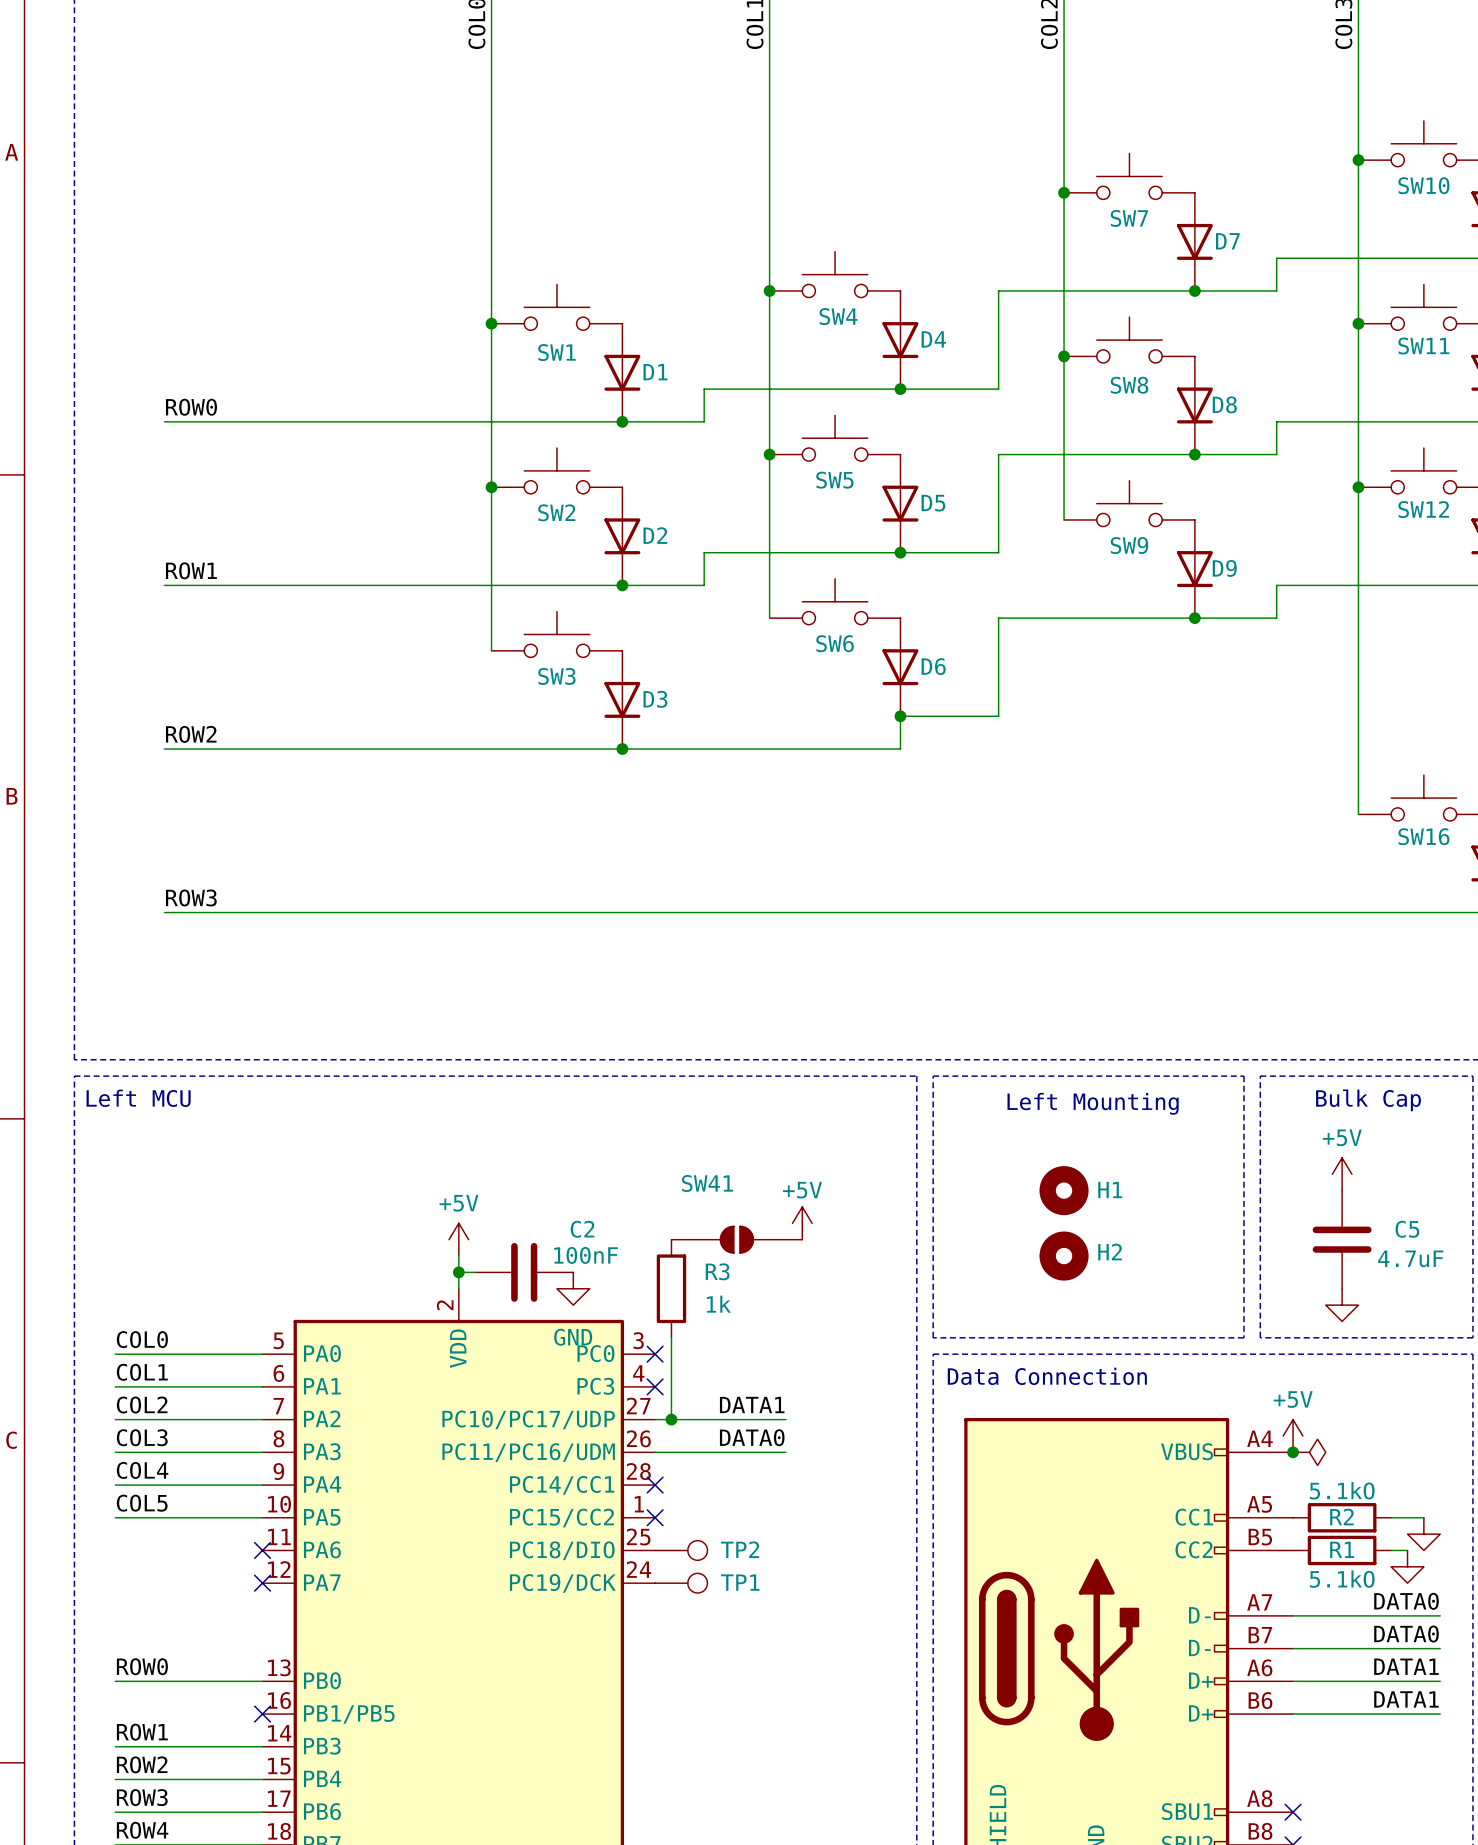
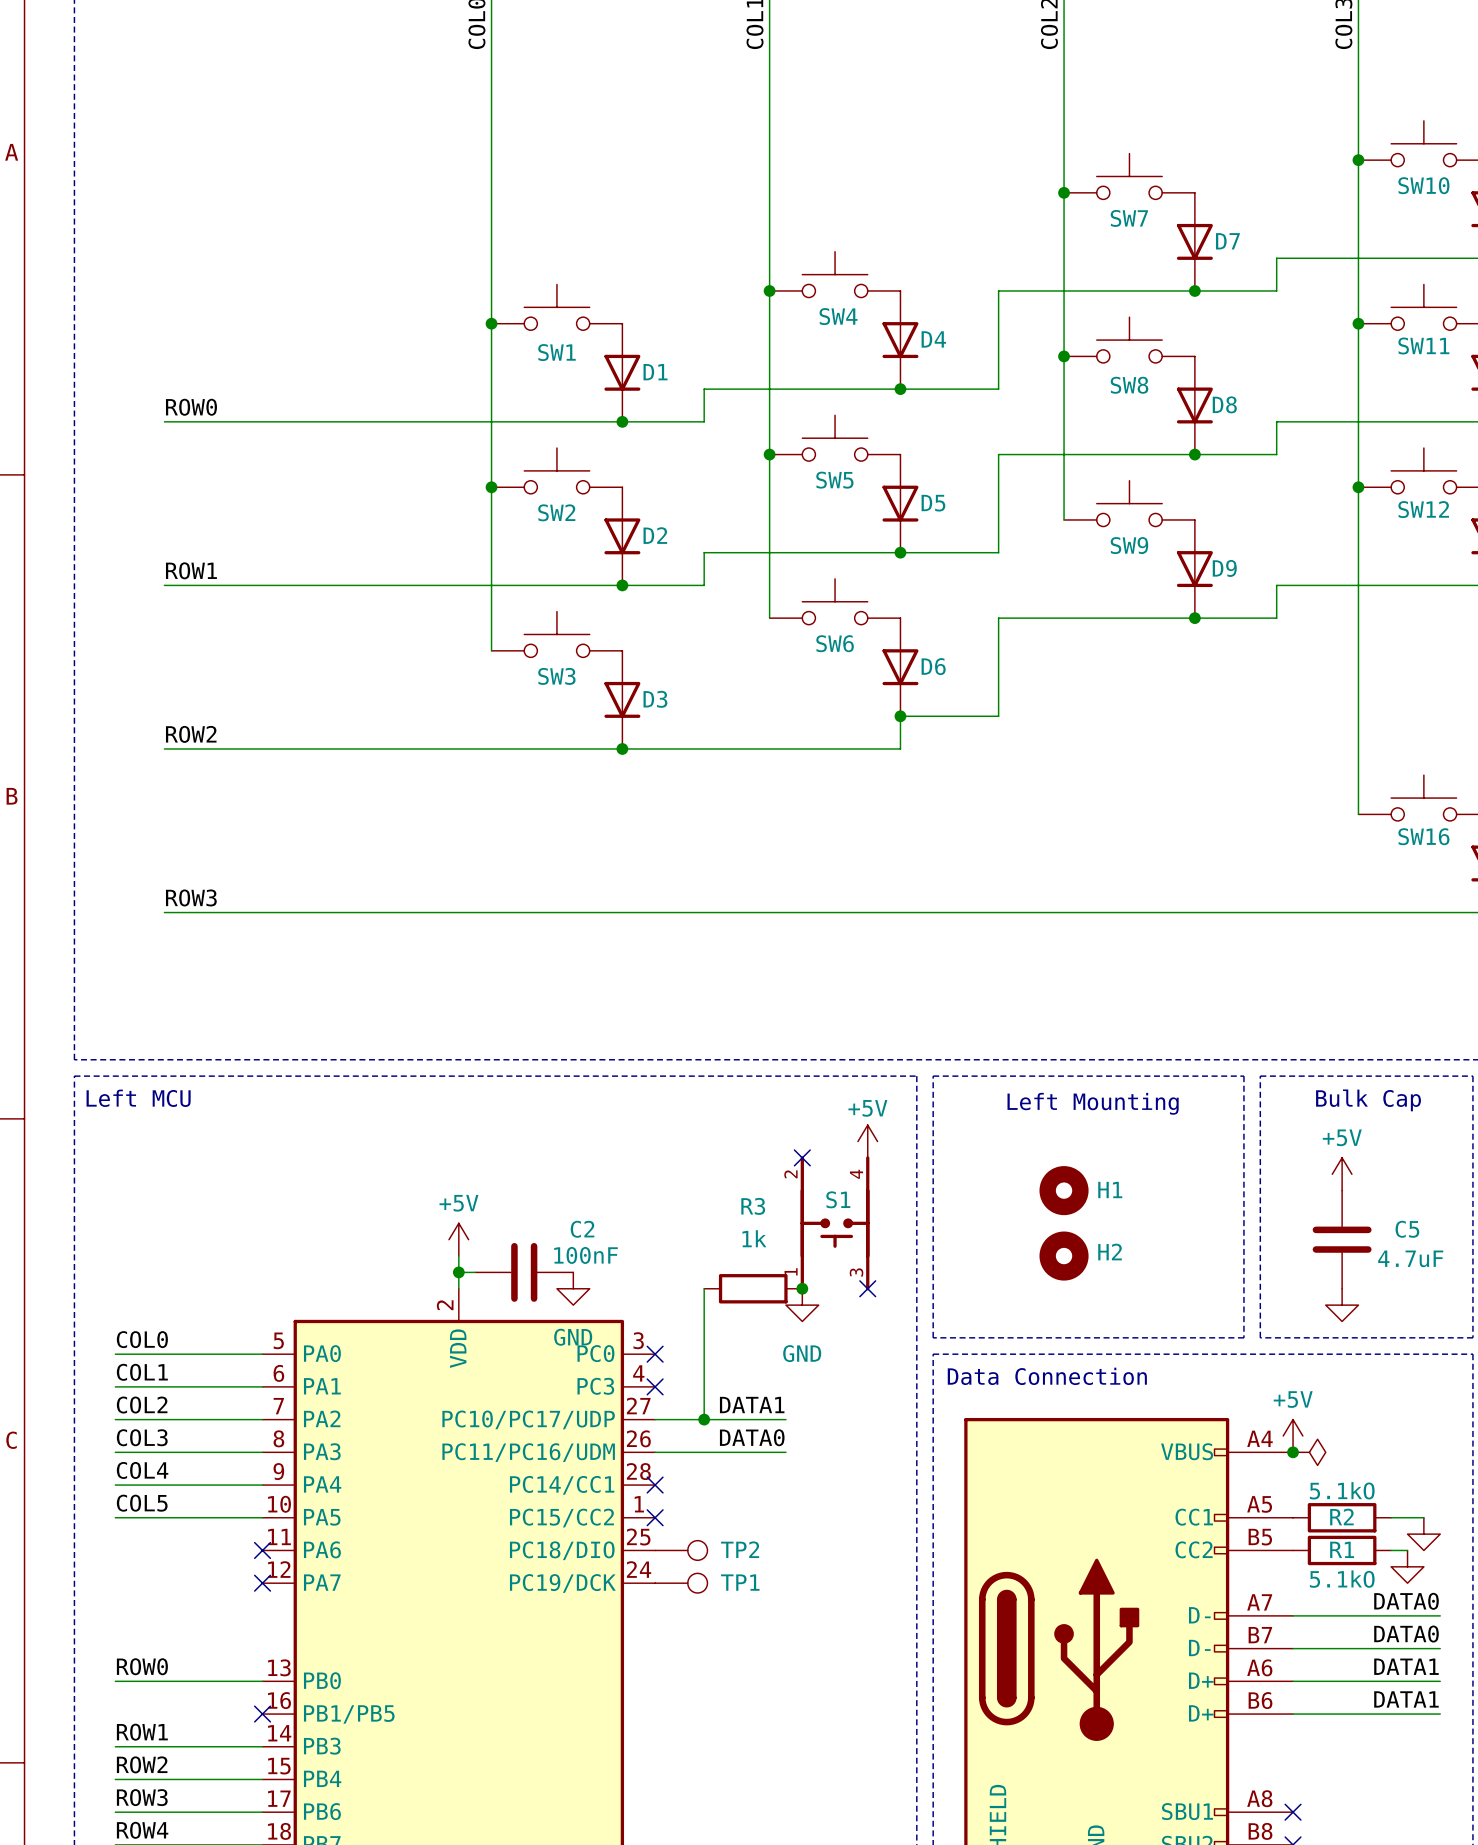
no-connect mark: none -> (802, 1157)
power symbol position: +5V (802, 1223) -> +5V (867, 1141)
S1: none -> (835, 1223)
SW41: (736, 1239) -> none
R3 name position: R3 (717, 1271) -> R3 (753, 1206)
R3 rotation: 0° (671, 1288) -> 90° clockwise (753, 1288)
R3 position: (671, 1288) -> (753, 1288)
wire: none -> (704, 1288) (704, 1419)
junction: none -> (802, 1288)
no-connect mark: none -> (867, 1288)
R3 value position: 1k (718, 1304) -> 1k (754, 1238)
power symbol: none -> GND (802, 1305)
wire: (671, 1337) (671, 1419) -> none
junction position: (671, 1419) -> (704, 1419)

